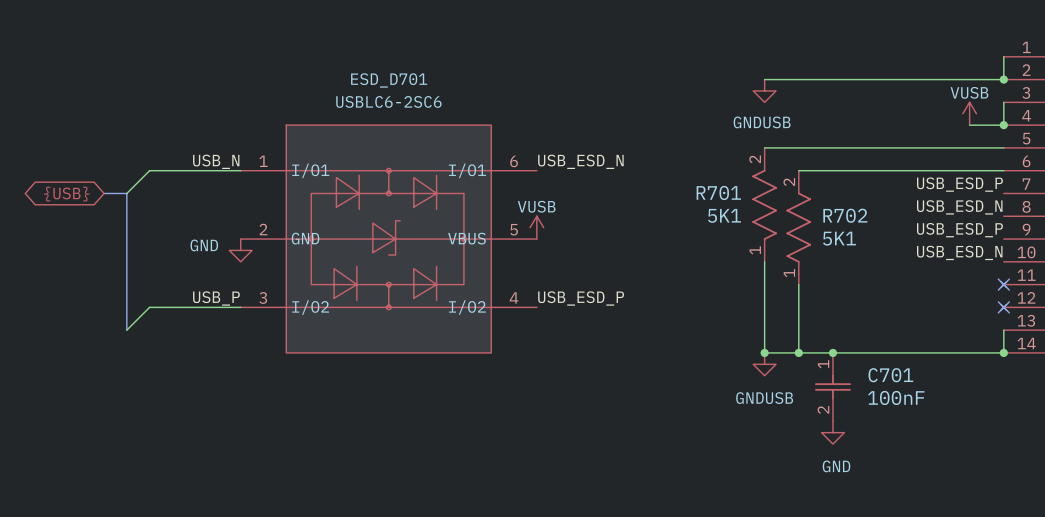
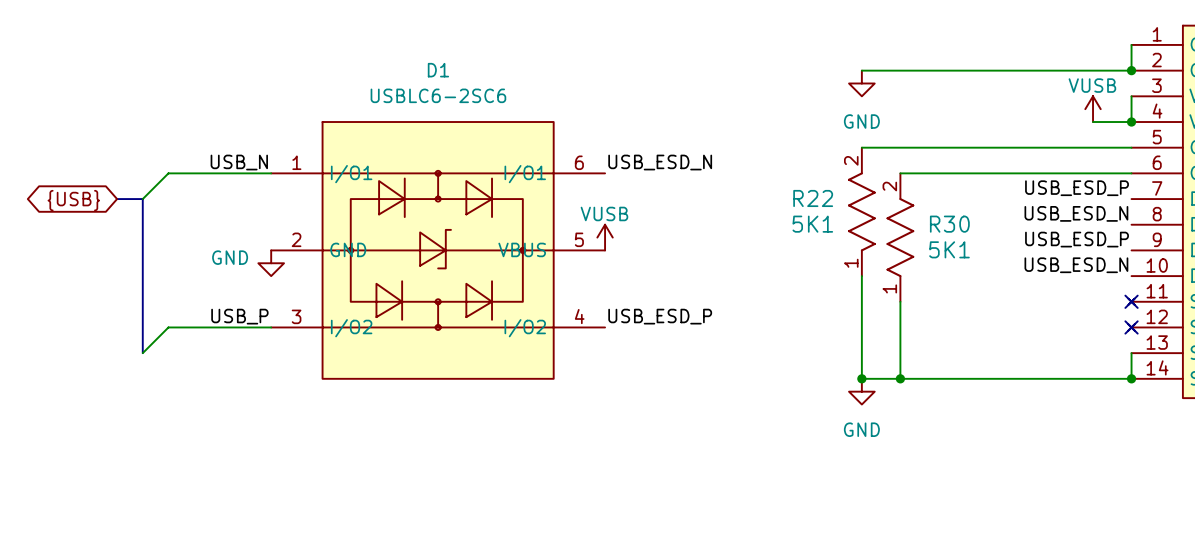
ESD_D701 name: ESD_D701 (389, 80) -> D1 (438, 70)
power symbol: GNDUSB (764, 90) -> GND (861, 83)
R701 name: R701 (718, 192) -> R22 (813, 198)
R702 name: R702 (845, 215) -> R30 (949, 224)
junction: (832, 352) -> none
power symbol: GNDUSB (764, 364) -> GND (861, 391)
C701: 100nF (832, 387) -> none
power symbol: GND (832, 432) -> none

